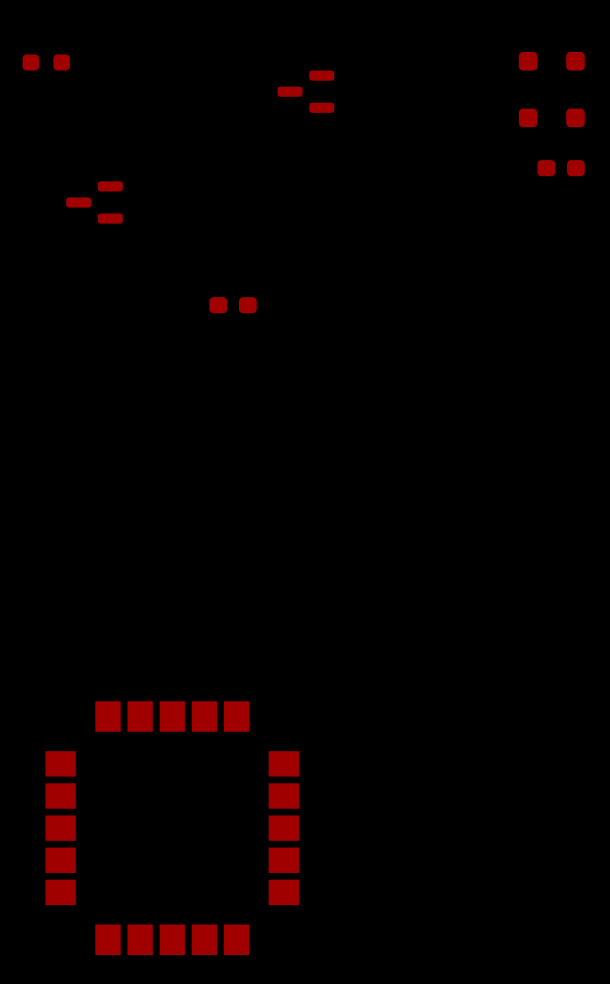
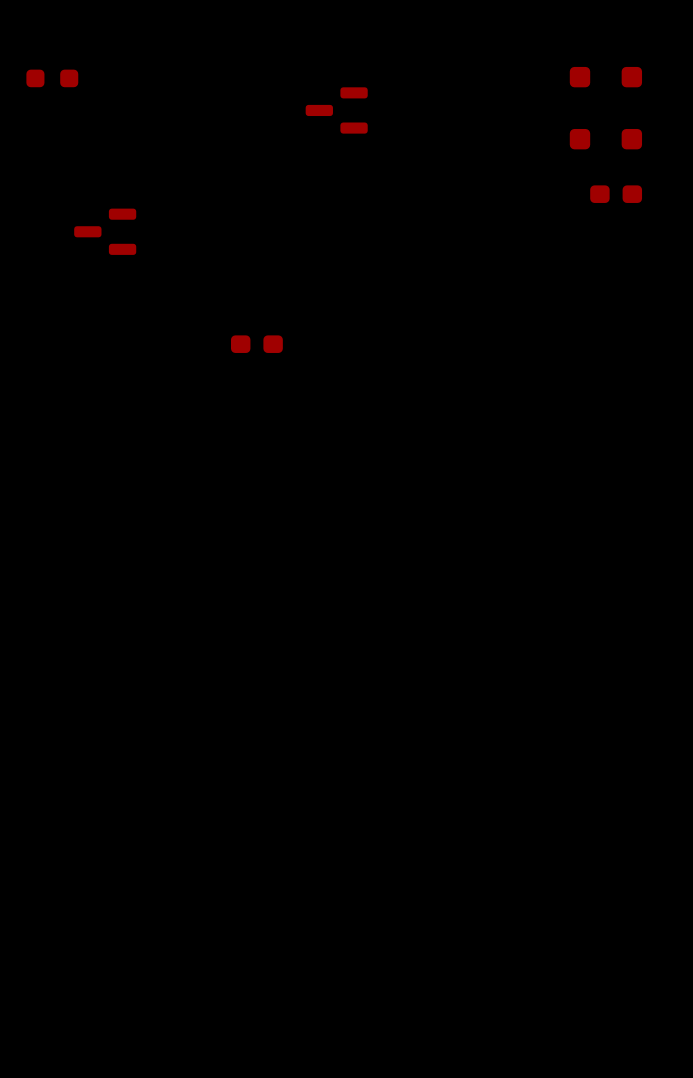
part: (172, 828) -> none

